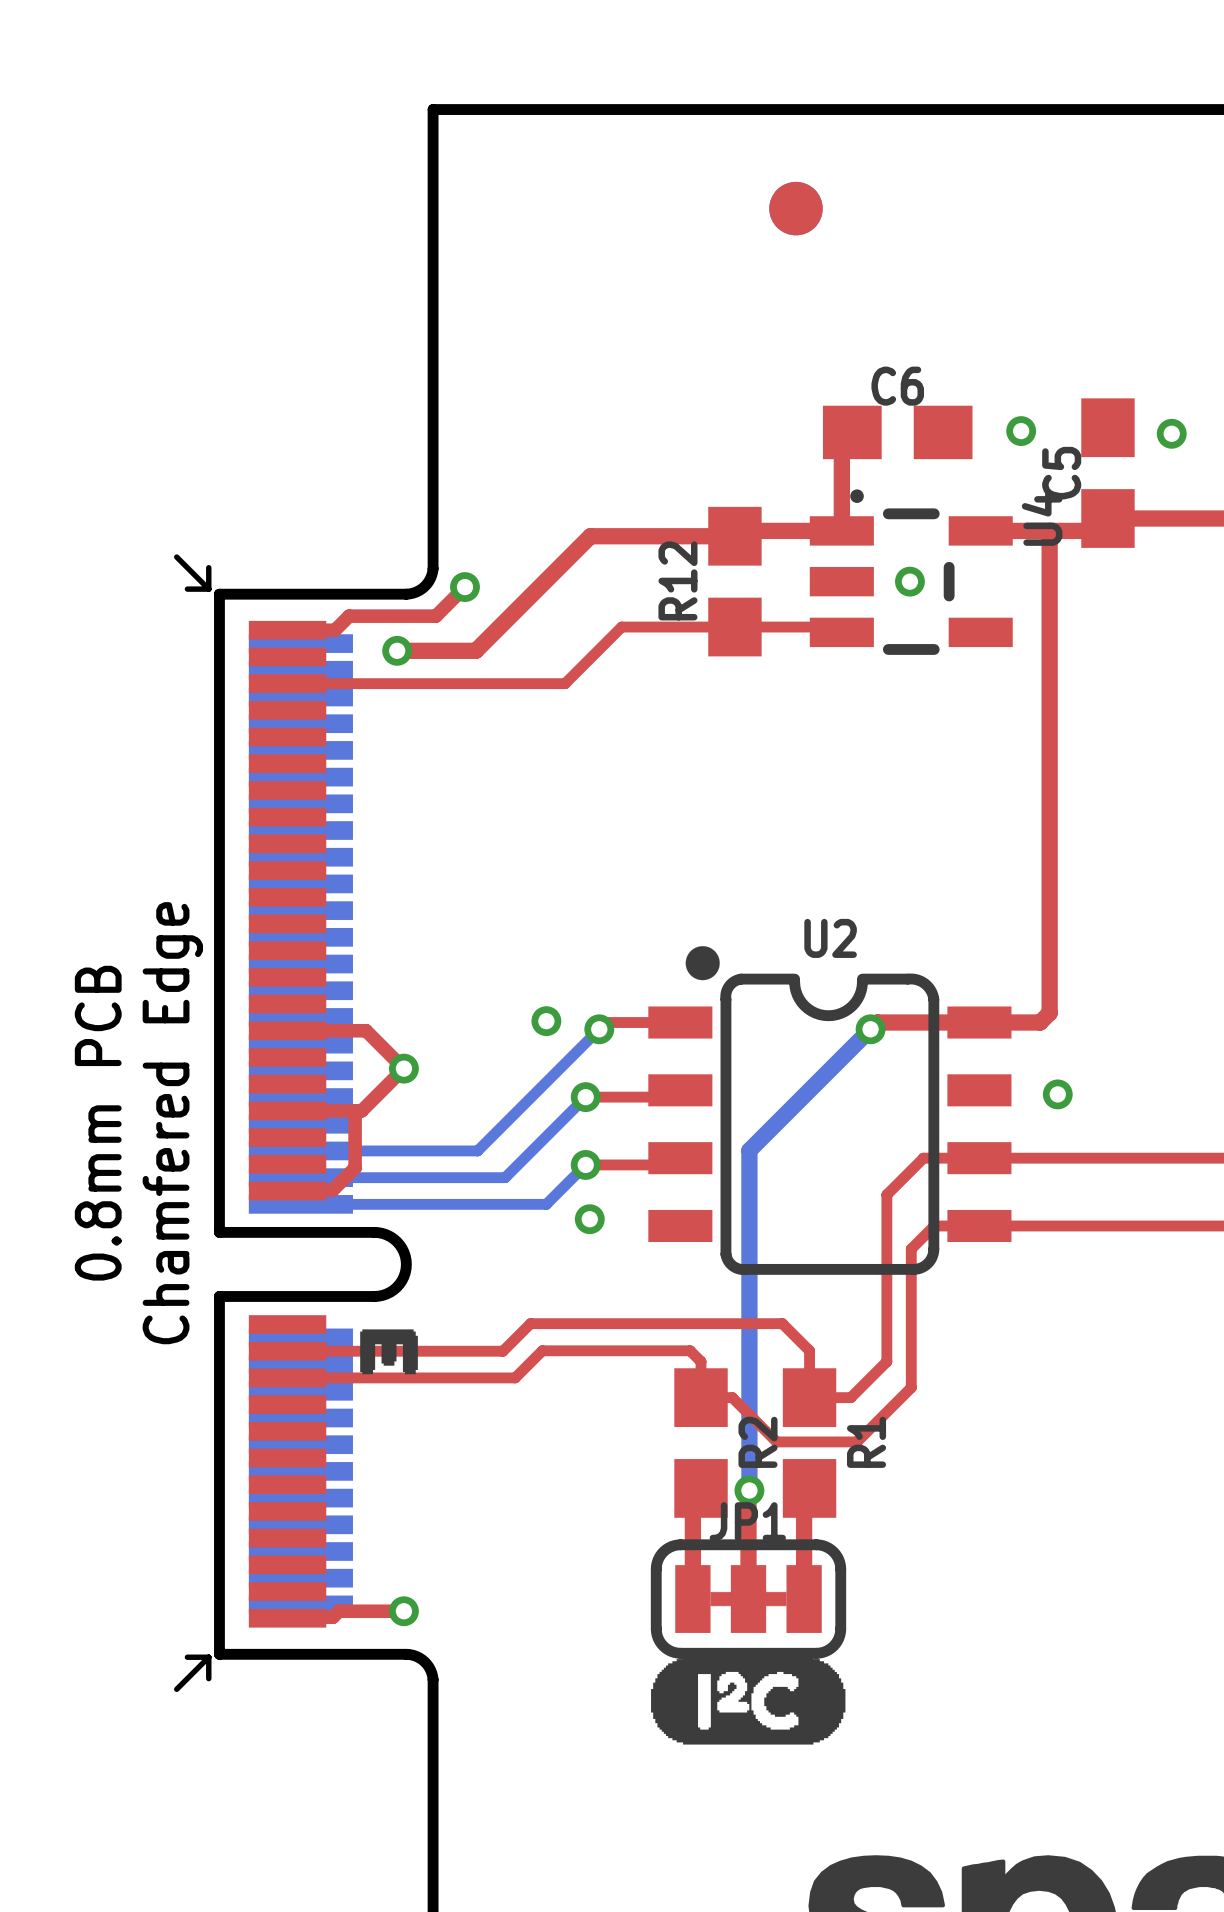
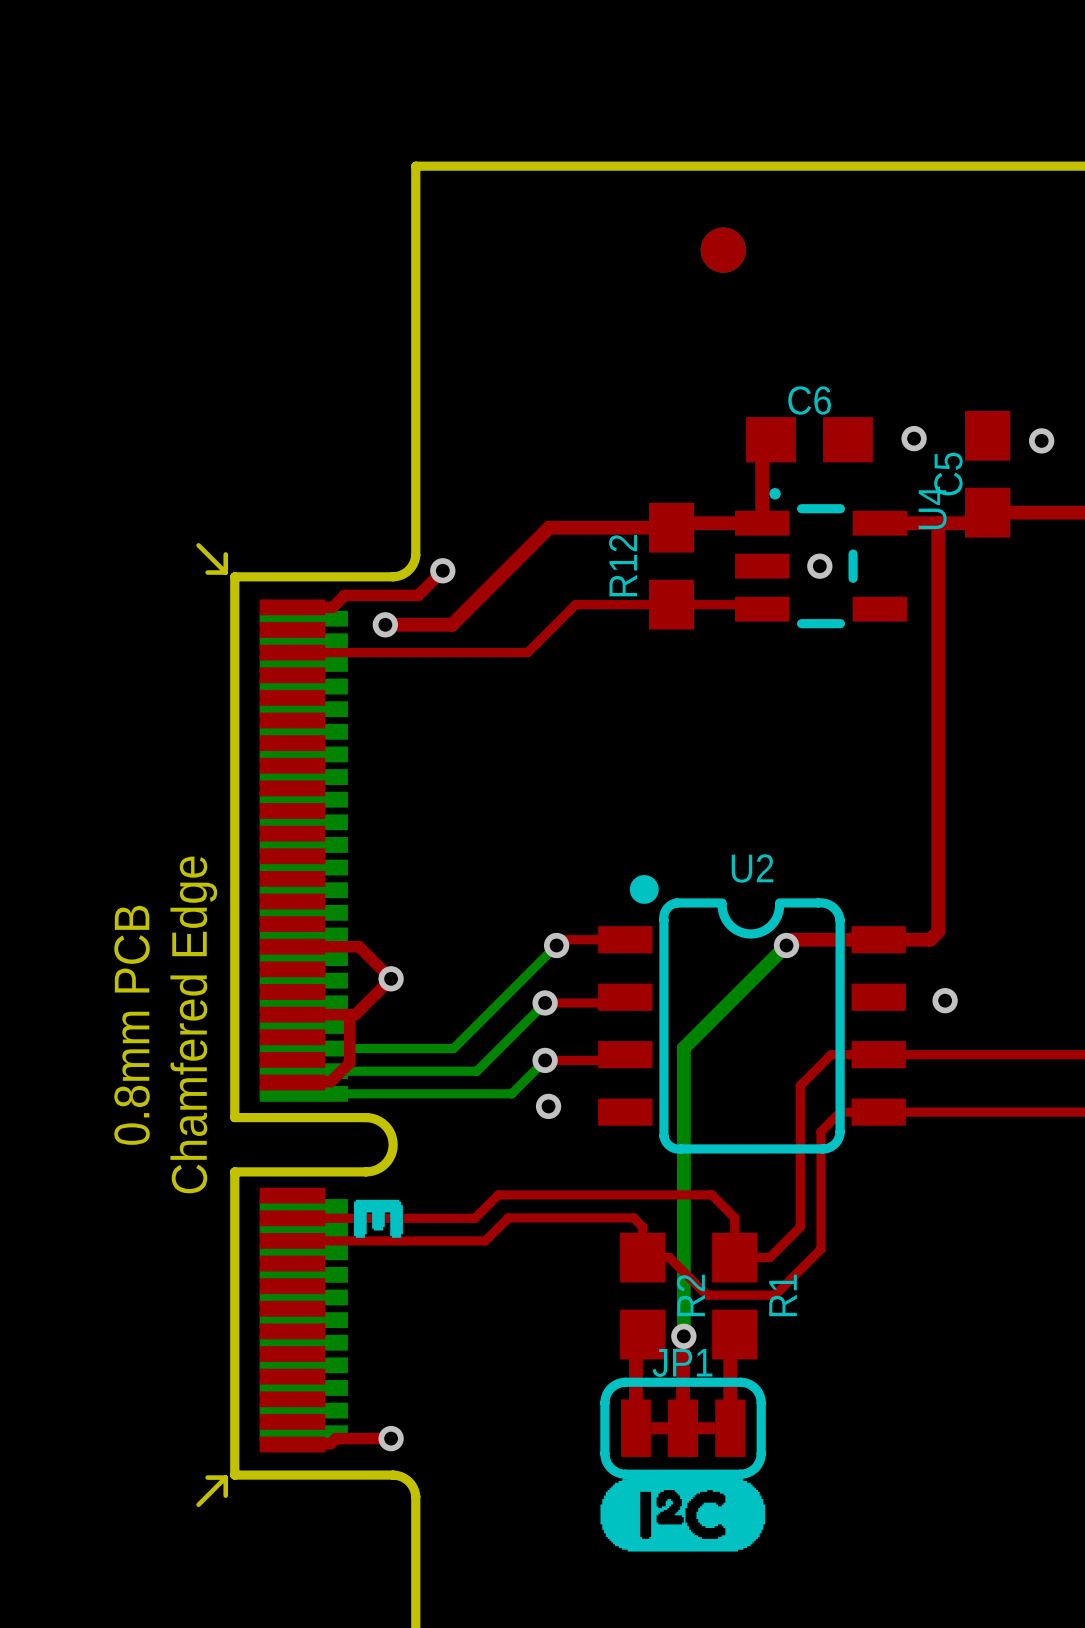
via: (546, 1021) -> none

